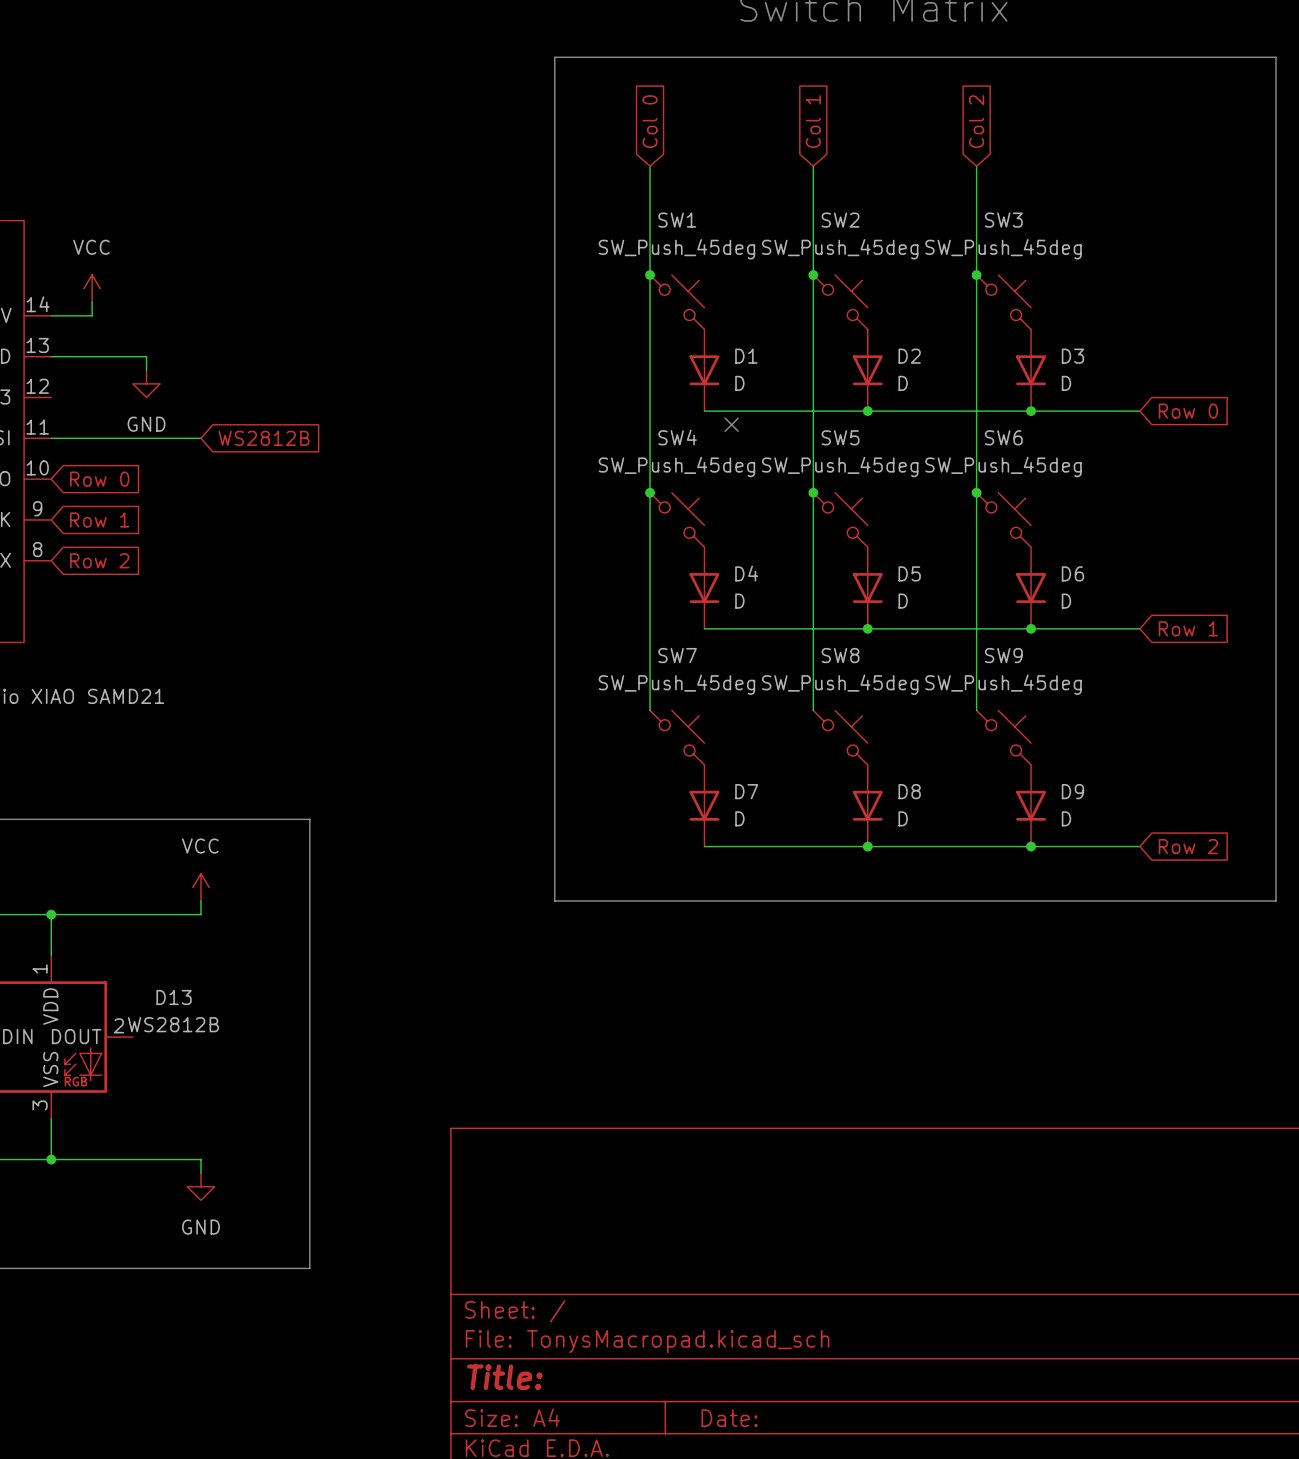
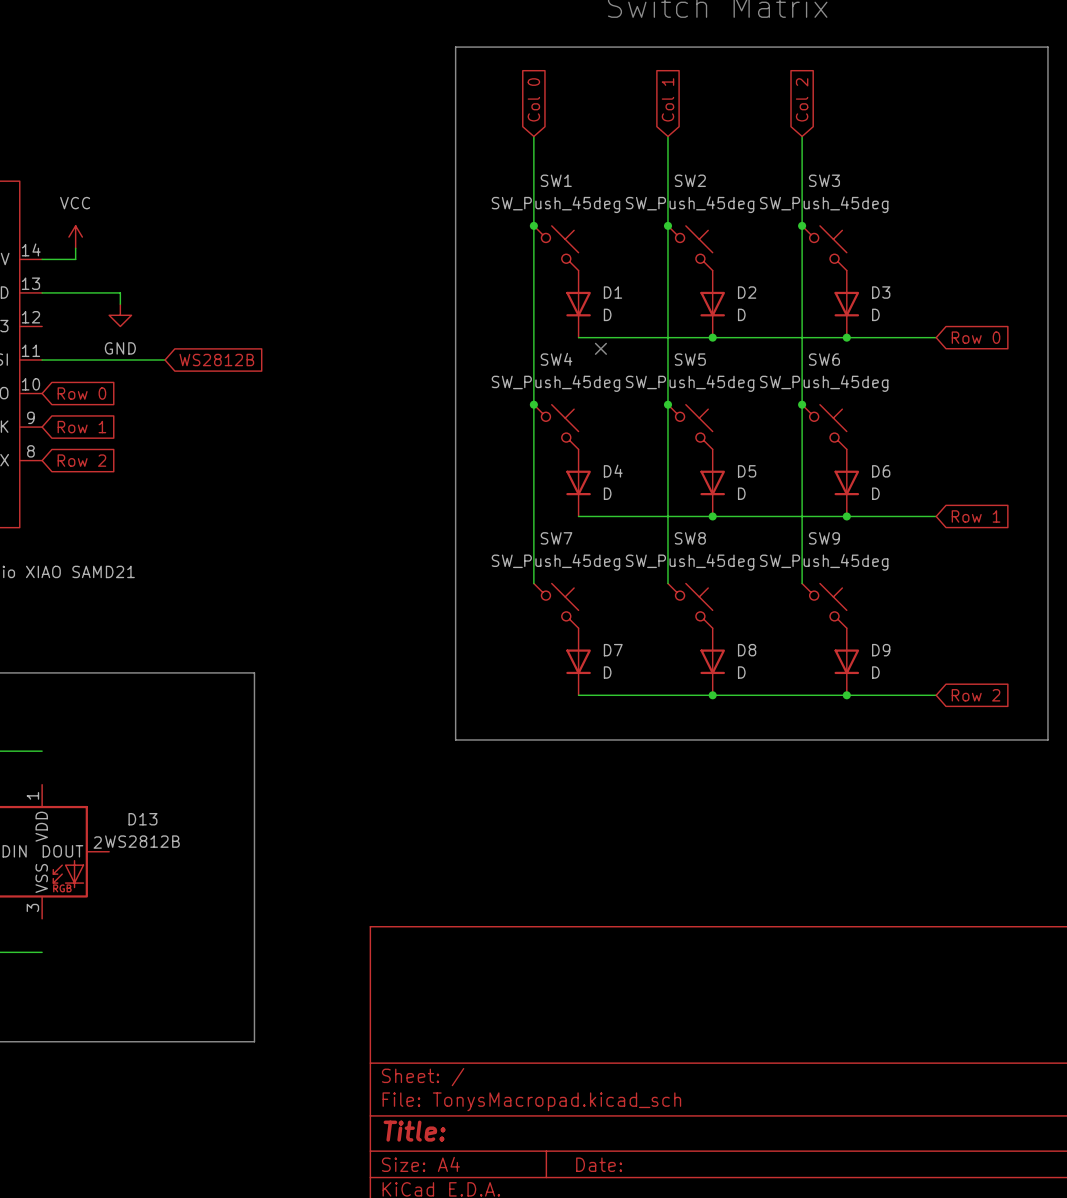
power symbol: VCC (200, 887) -> none
wire: (200, 901) (200, 914) (51, 914) (51, 955) -> none
junction: (51, 914) -> none
wire: (51, 1118) (51, 1159) (200, 1159) (200, 1173) -> none
junction: (51, 1159) -> none
power symbol: GND (200, 1186) -> none

